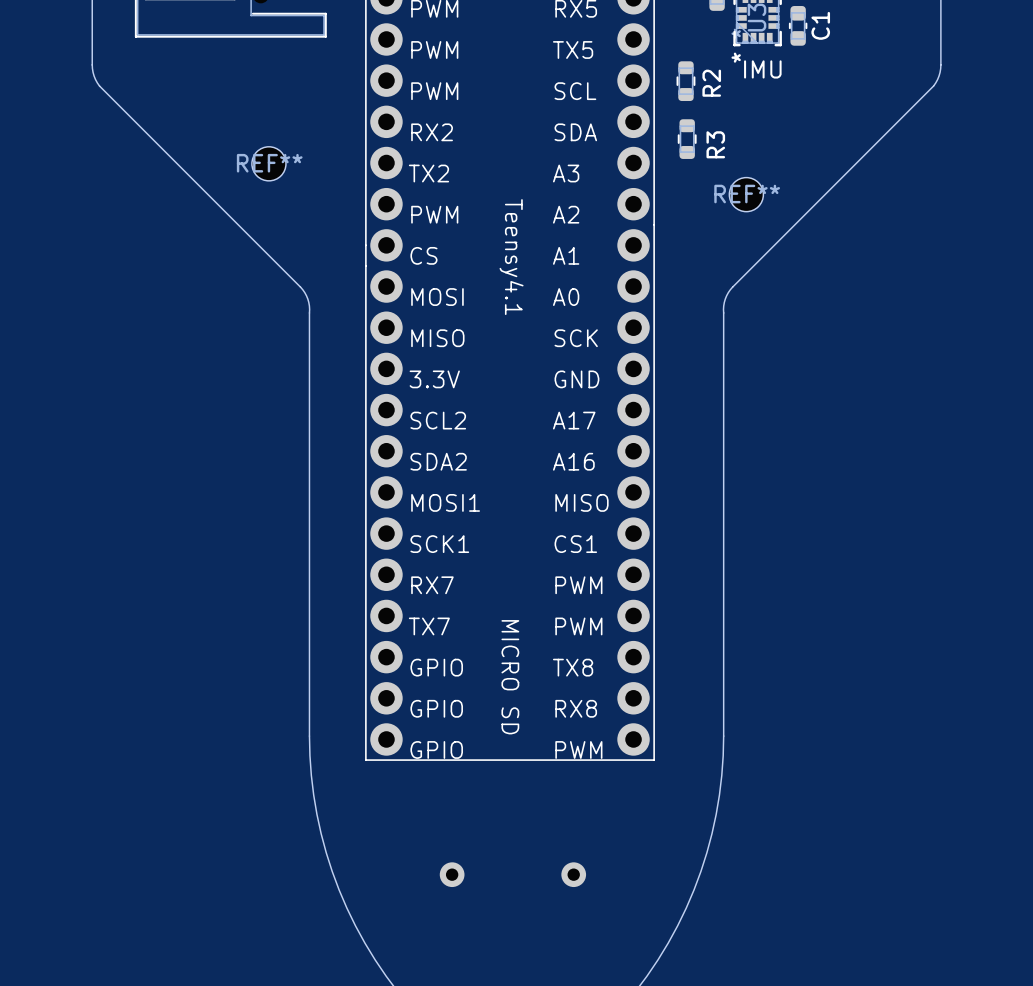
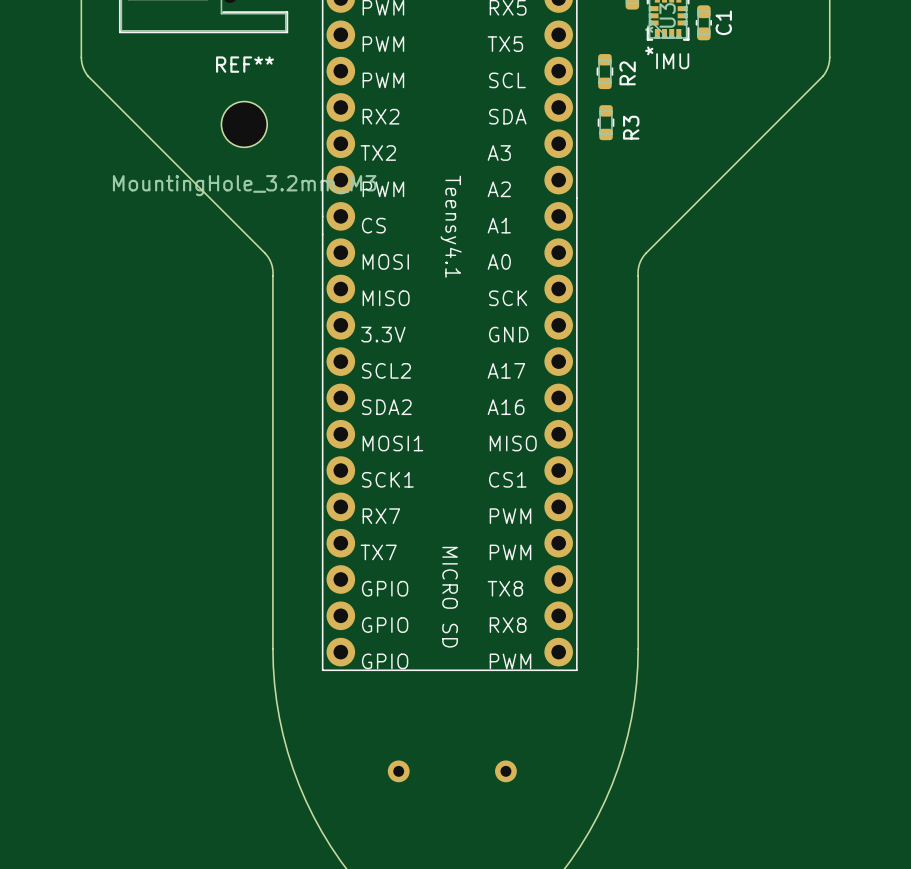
REF**: none -> MountingHole_3.2mm_M3 (244, 124)
REF**: (268, 163) -> none
REF**: (746, 194) -> none

